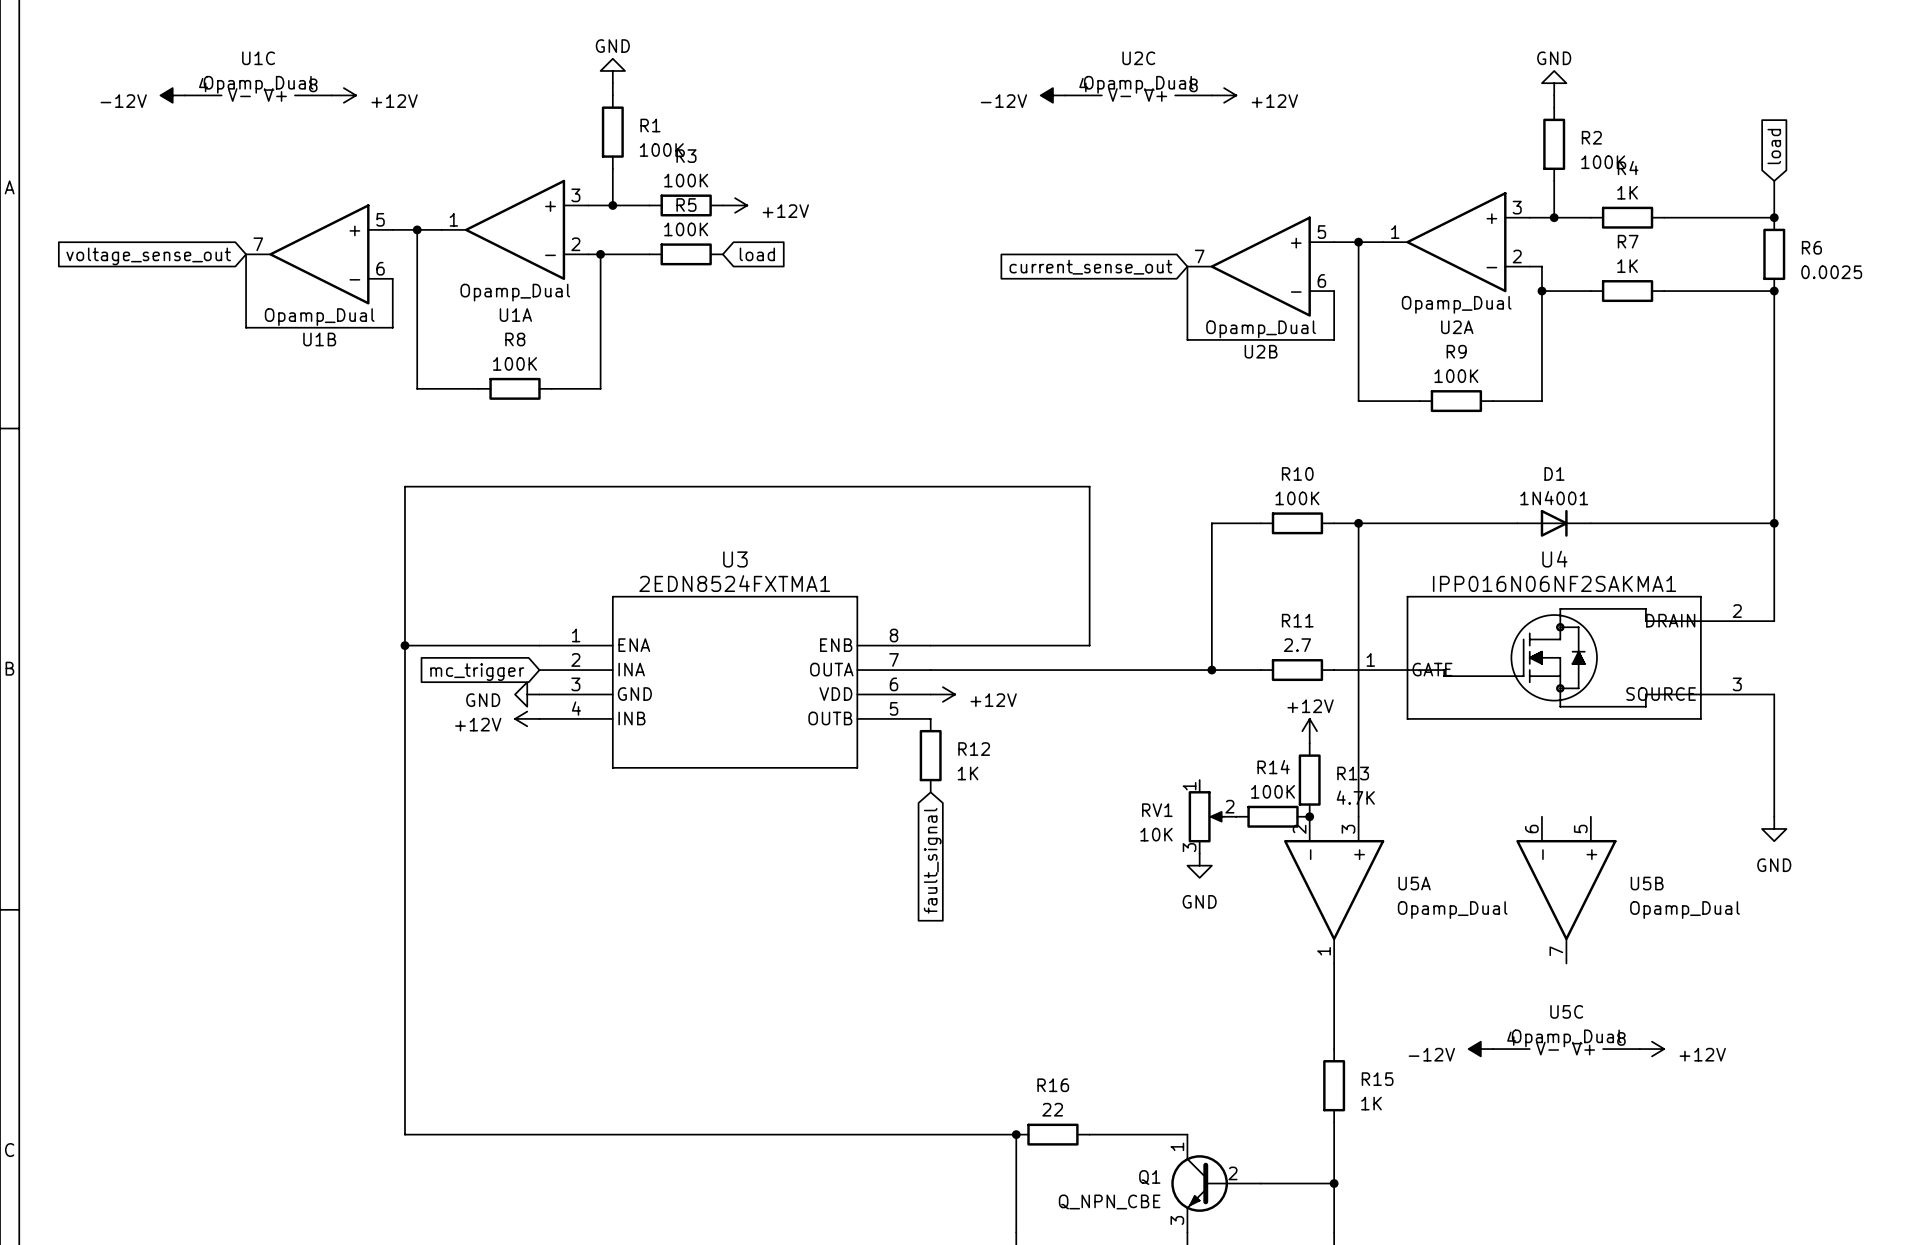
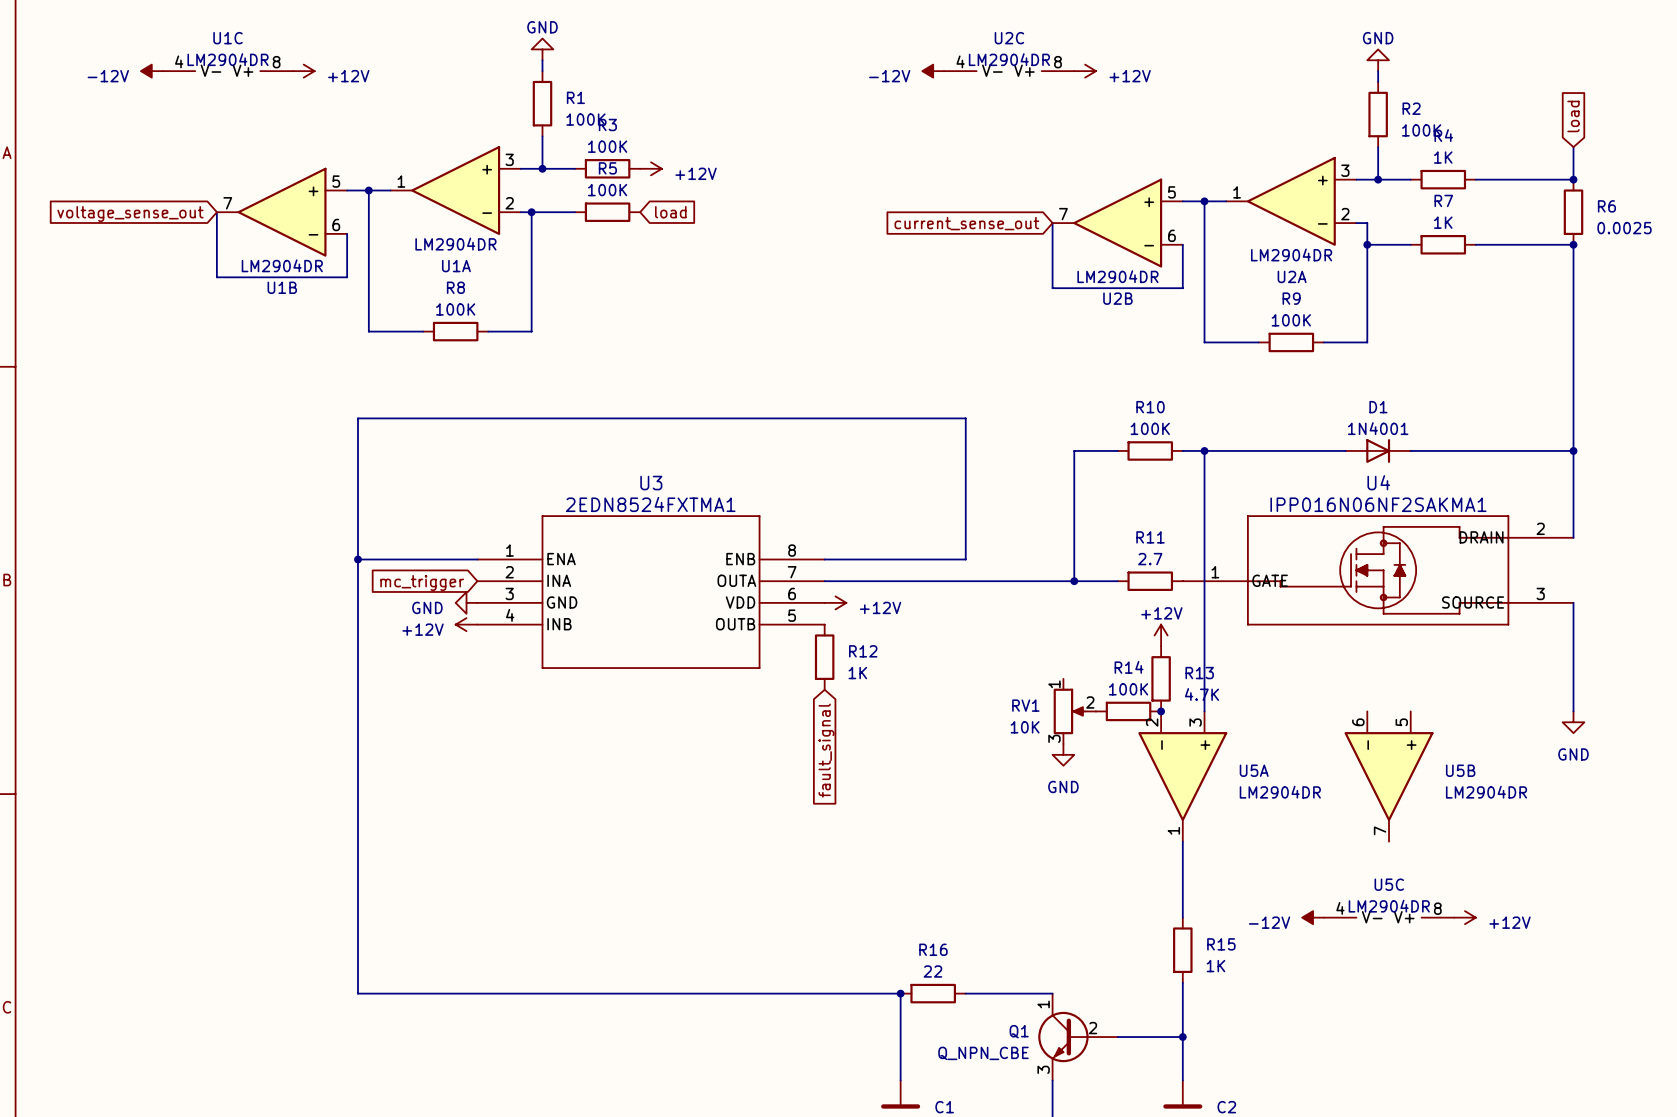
U1C value: Opamp_Dual (258, 84) -> LM2904DR (228, 59)
U2C value: Opamp_Dual (1138, 84) -> LM2904DR (1009, 59)
U1A value: Opamp_Dual (515, 292) -> LM2904DR (455, 244)
U2A value: Opamp_Dual (1456, 304) -> LM2904DR (1291, 254)
U1B value: Opamp_Dual (319, 317) -> LM2904DR (282, 265)
U2B value: Opamp_Dual (1261, 329) -> LM2904DR (1117, 276)
U5A value: Opamp_Dual (1452, 910) -> LM2904DR (1280, 792)
U5B value: Opamp_Dual (1684, 910) -> LM2904DR (1486, 792)
U5C value: Opamp_Dual (1566, 1038) -> LM2904DR (1389, 906)

